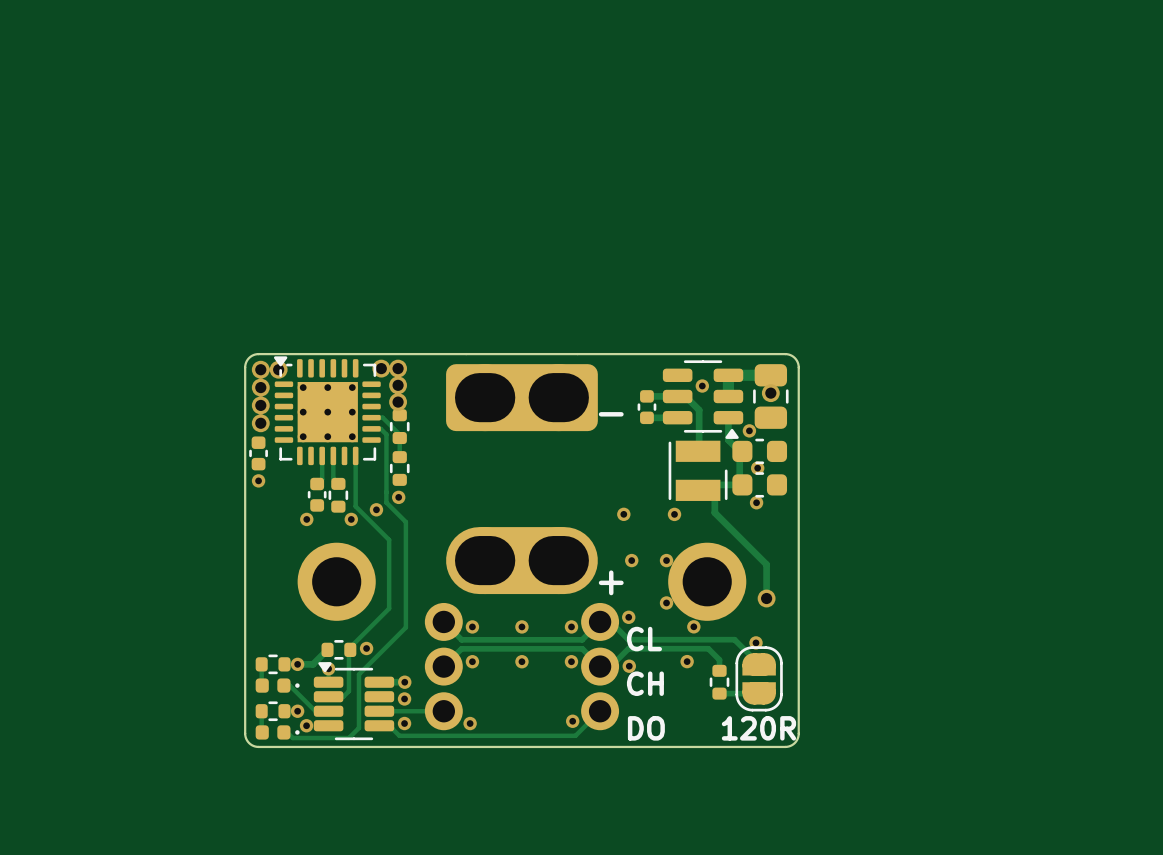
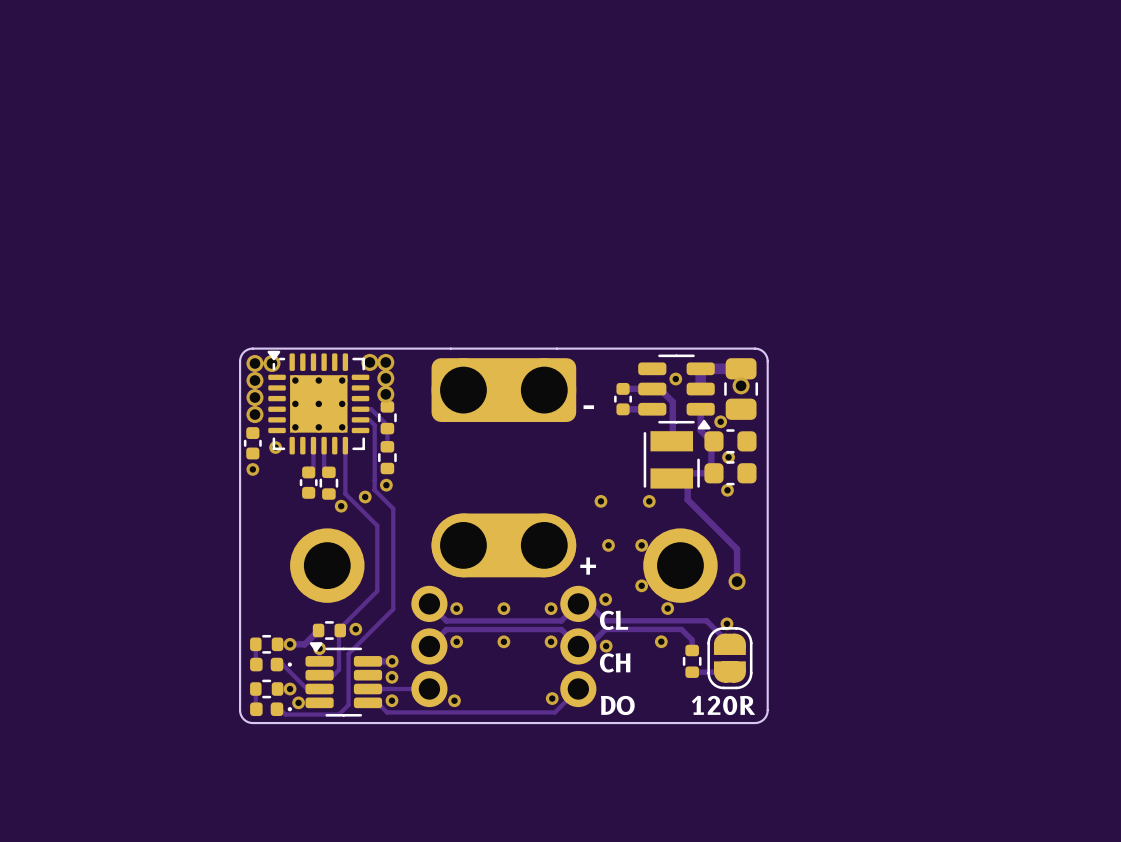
part footprint: [446, 364, 598, 432] -> [431, 358, 577, 423]
via position: (306, 519) -> (275, 447)
part footprint: [446, 527, 598, 595] -> [431, 513, 577, 578]

